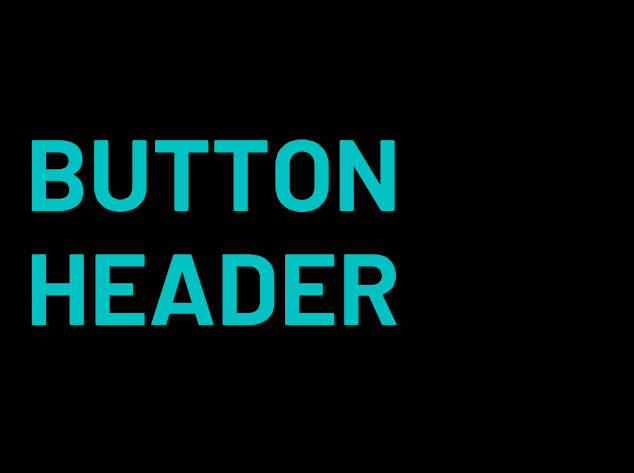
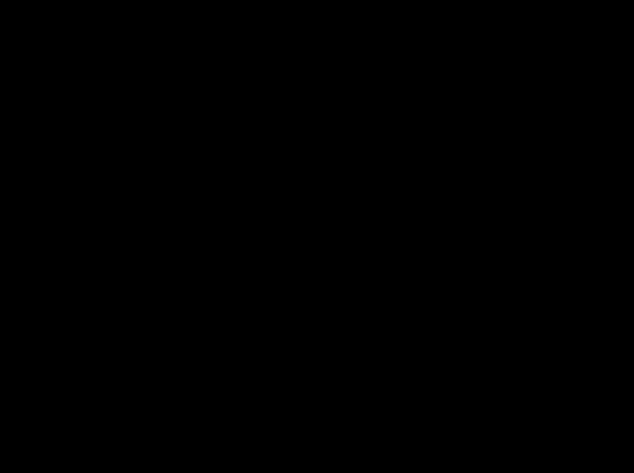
text: BUTTON (213, 175) -> none
text: HEADER (214, 289) -> none

